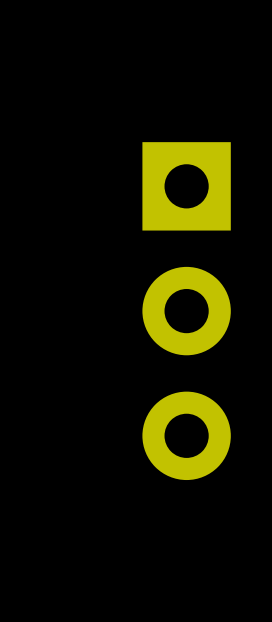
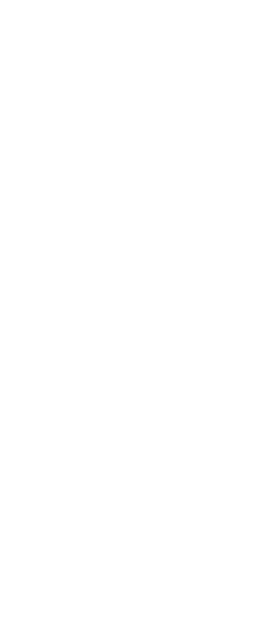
part: (186, 311) -> none

